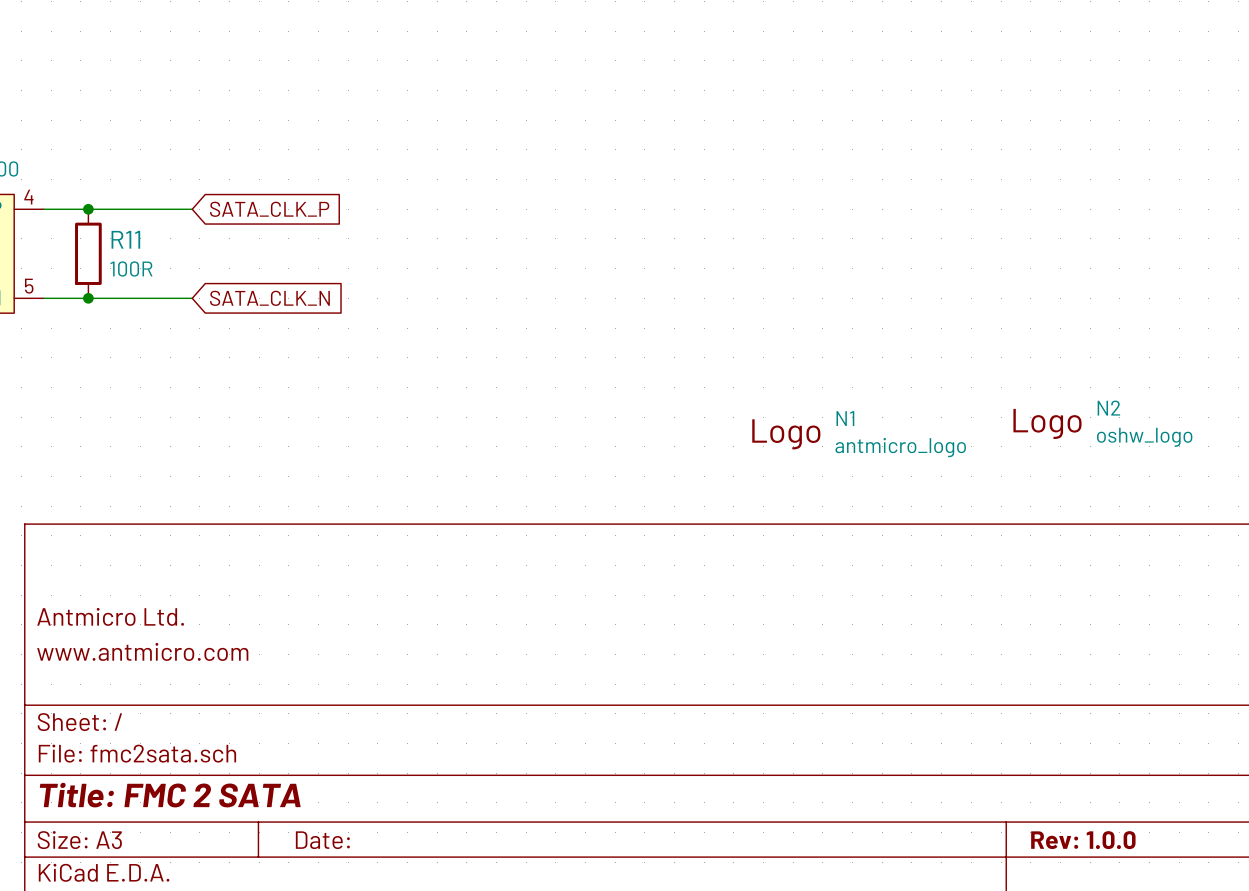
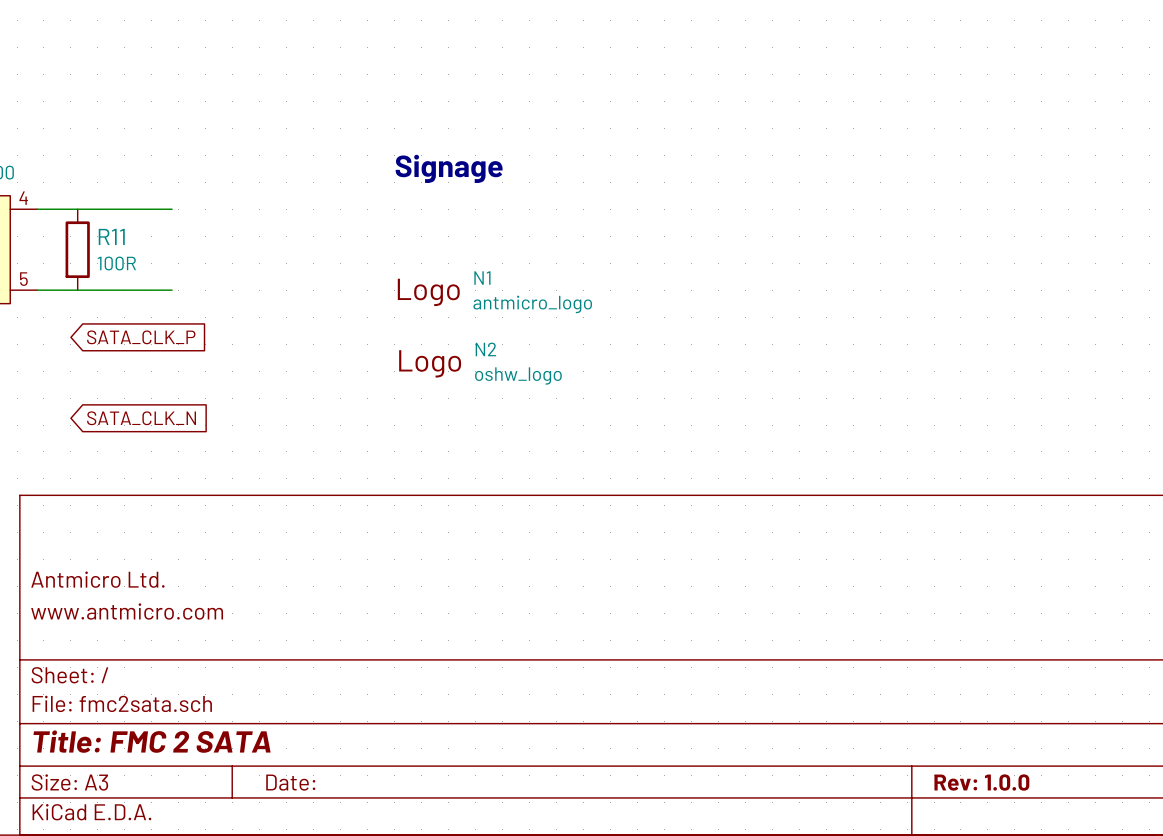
text: none -> Signage (449, 168)
junction: (88, 209) -> none
global label position: SATA_CLK_P (269, 209) -> SATA_CLK_P (141, 337)
junction: (88, 298) -> none
global label position: SATA_CLK_N (269, 298) -> SATA_CLK_N (141, 418)
N2 position: (1102, 423) -> (480, 363)
N1 position: (859, 434) -> (494, 292)

